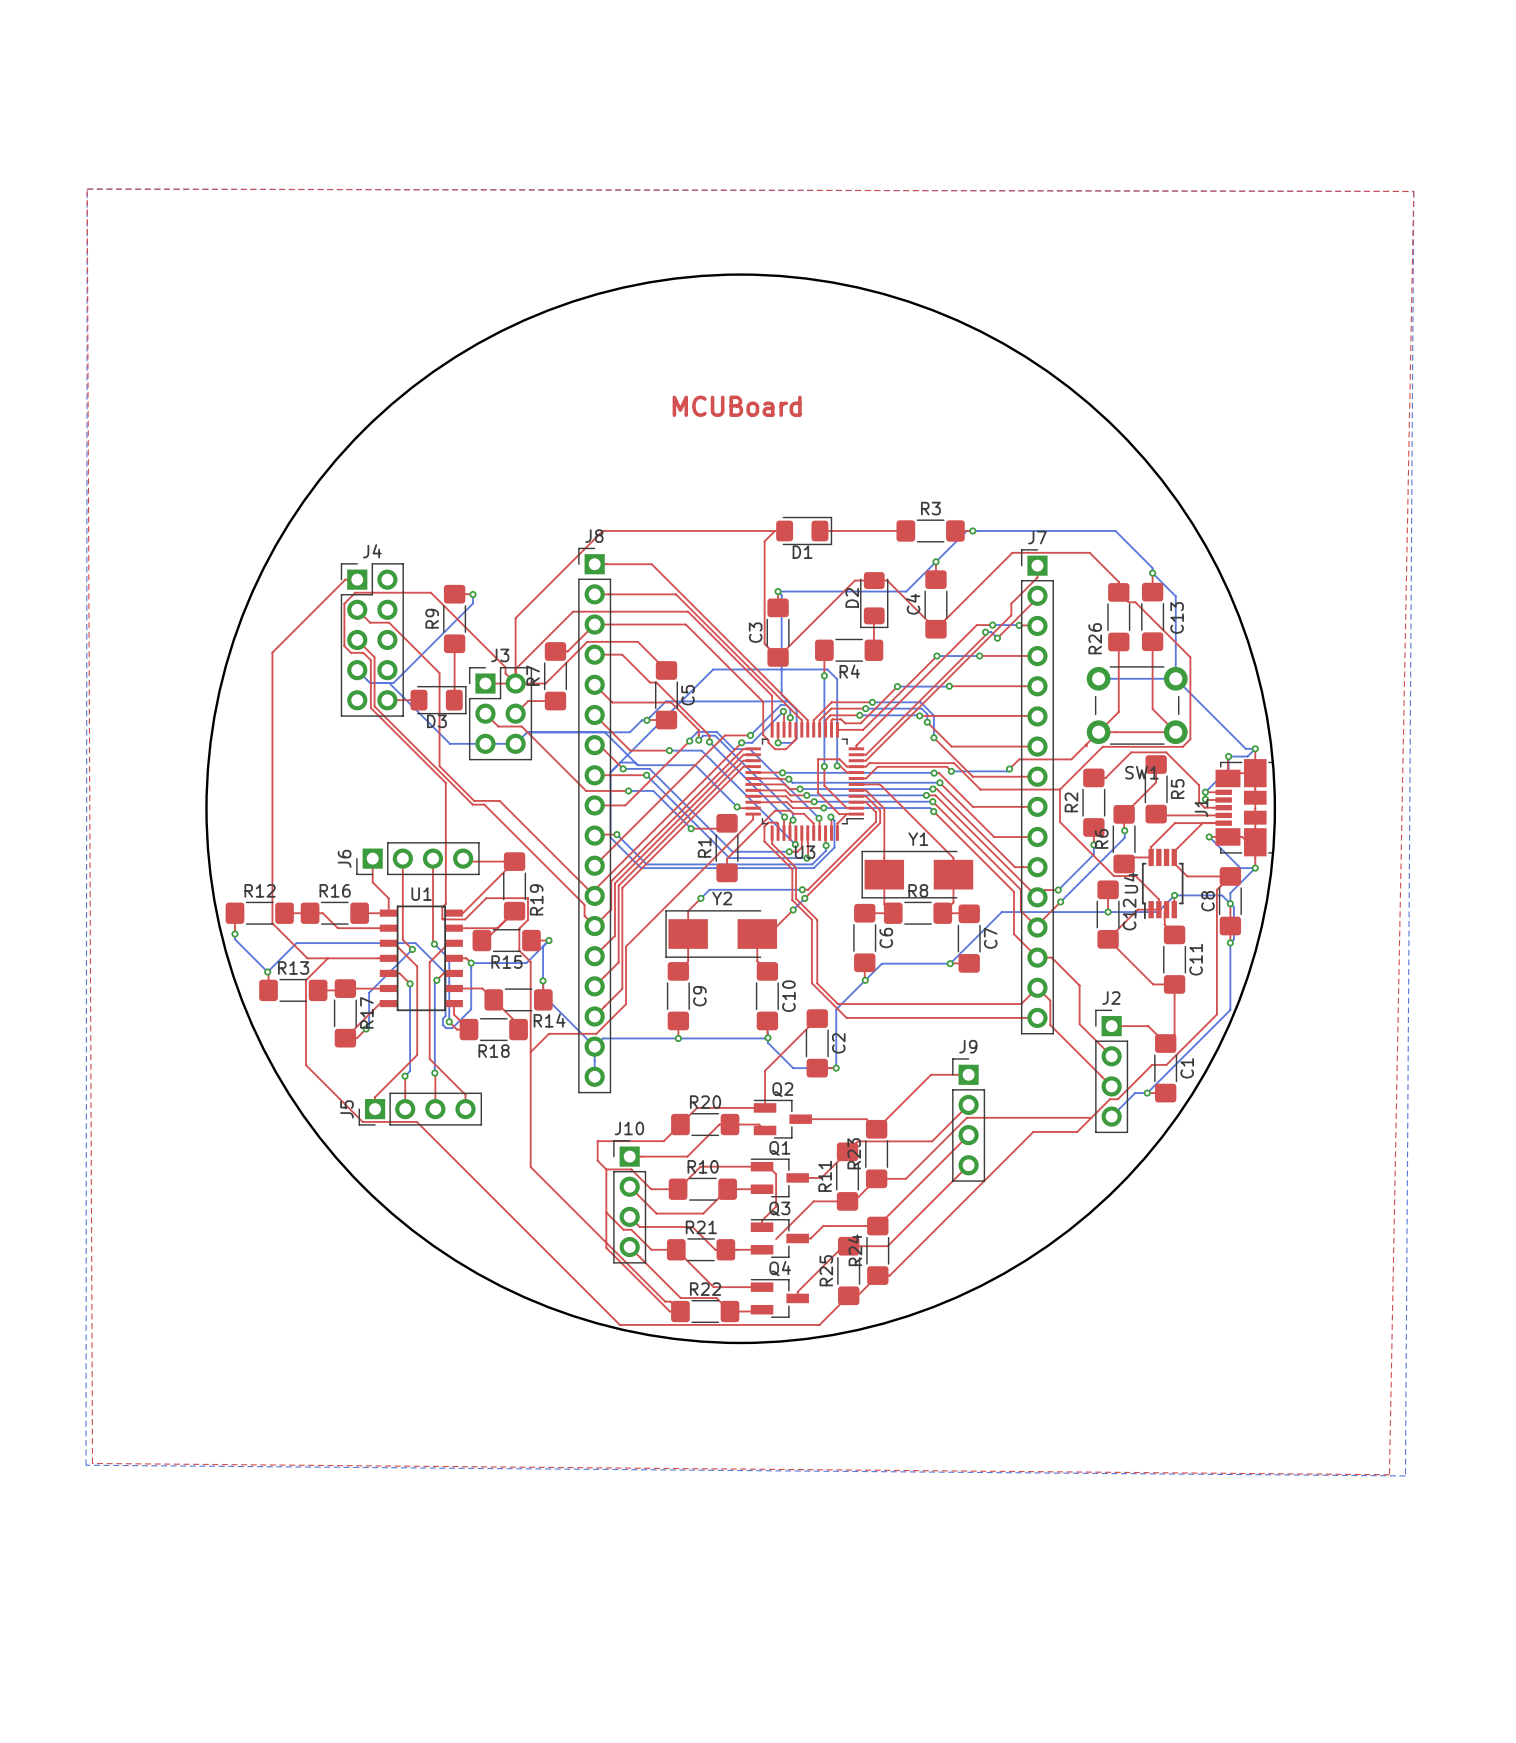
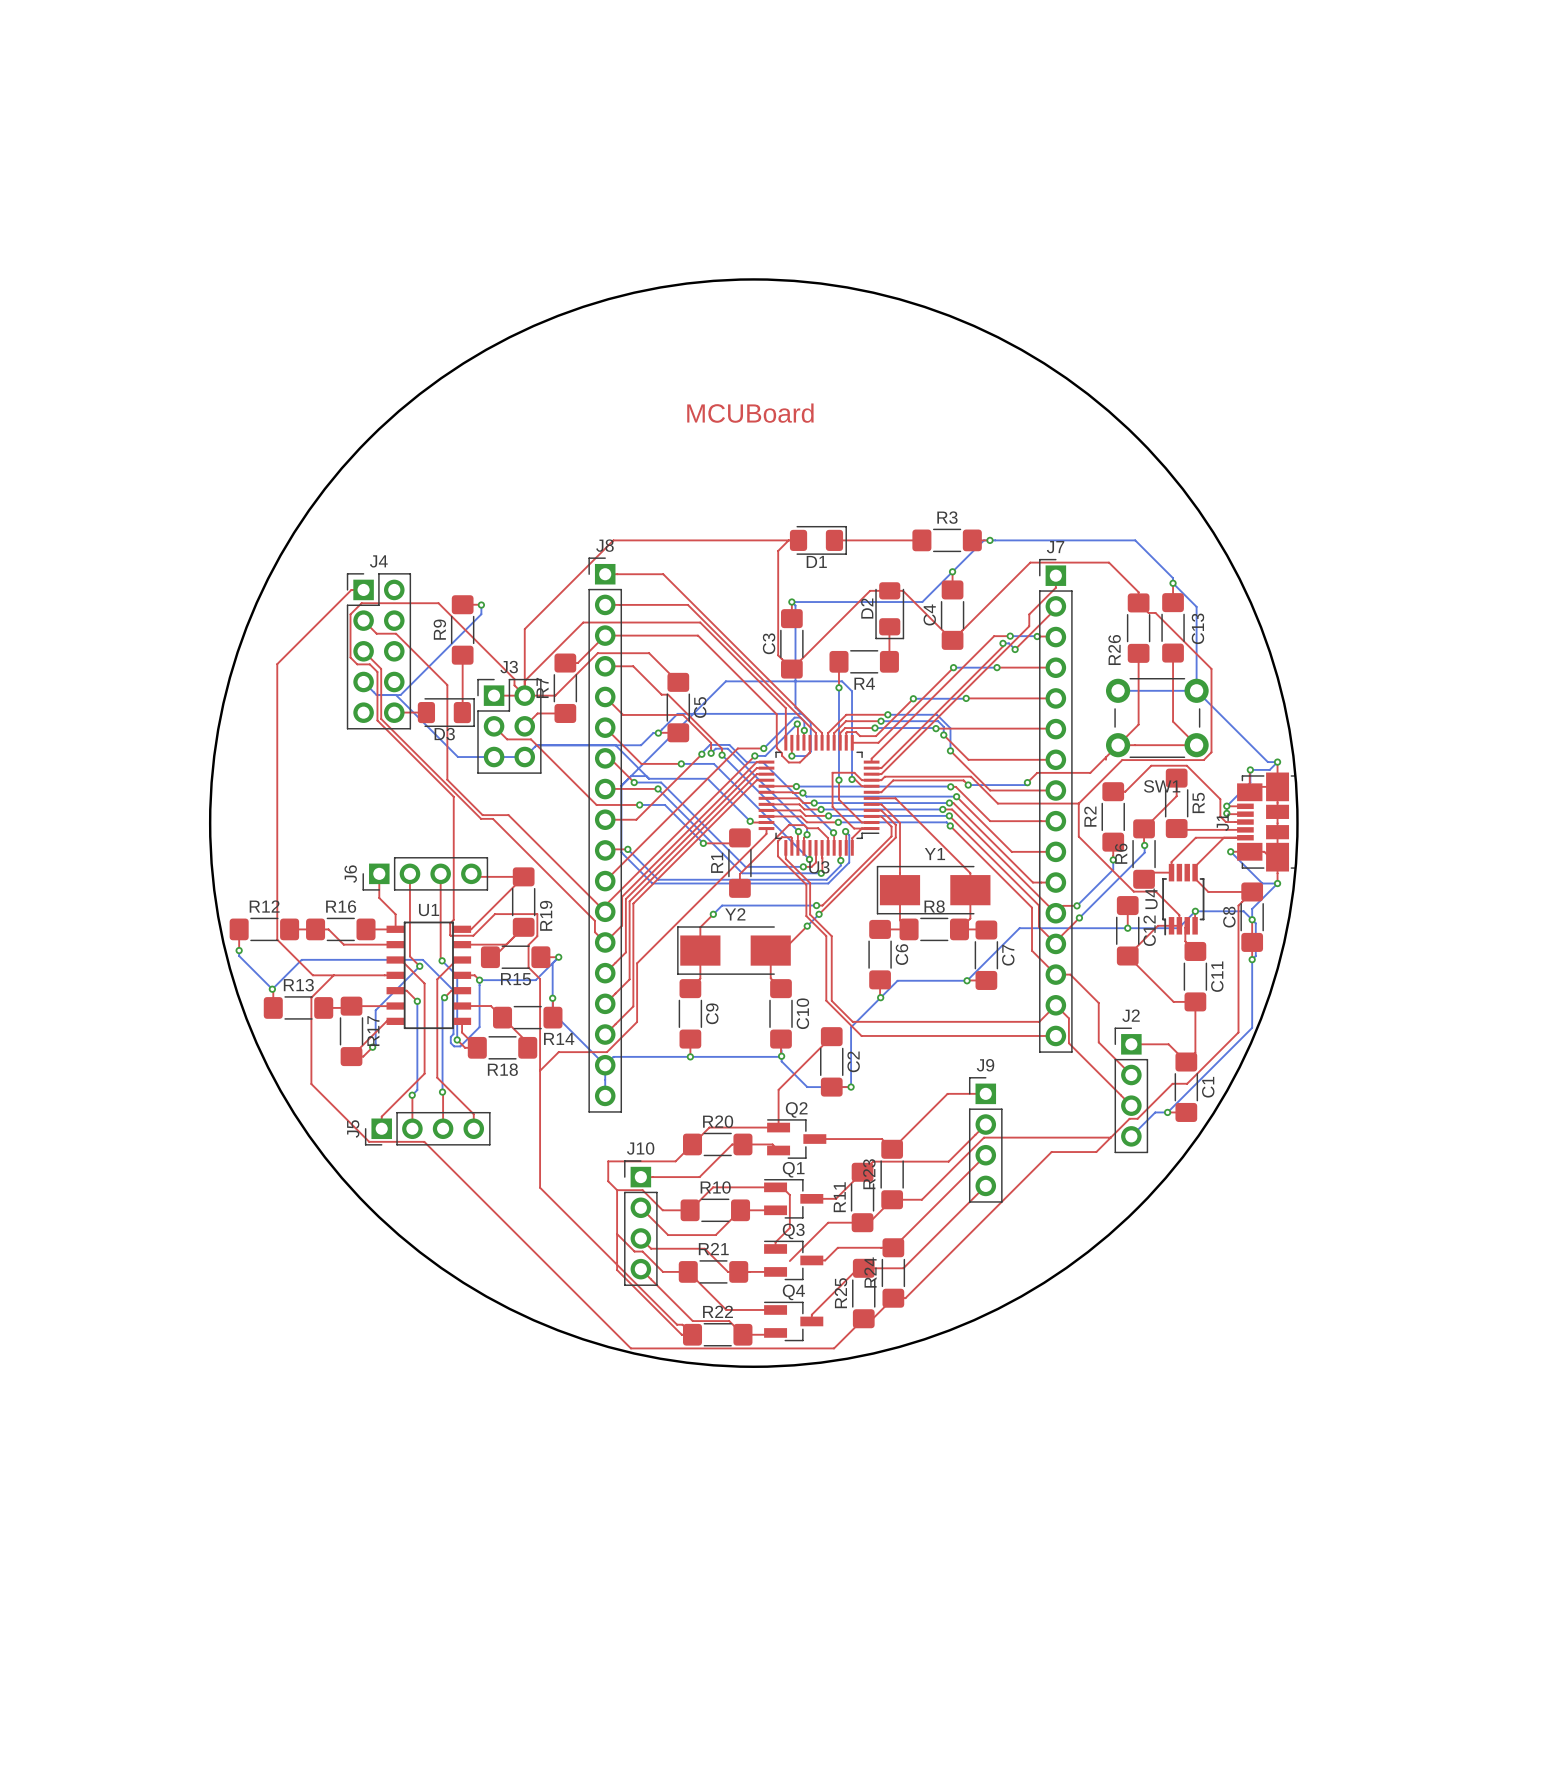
top zone outline: (87, 189) (1413, 191) (1389, 1474) (92, 1463) (87, 189) -> none
bottom zone outline: (87, 189) (1413, 191) (1405, 1475) (86, 1465) (87, 189) -> none

